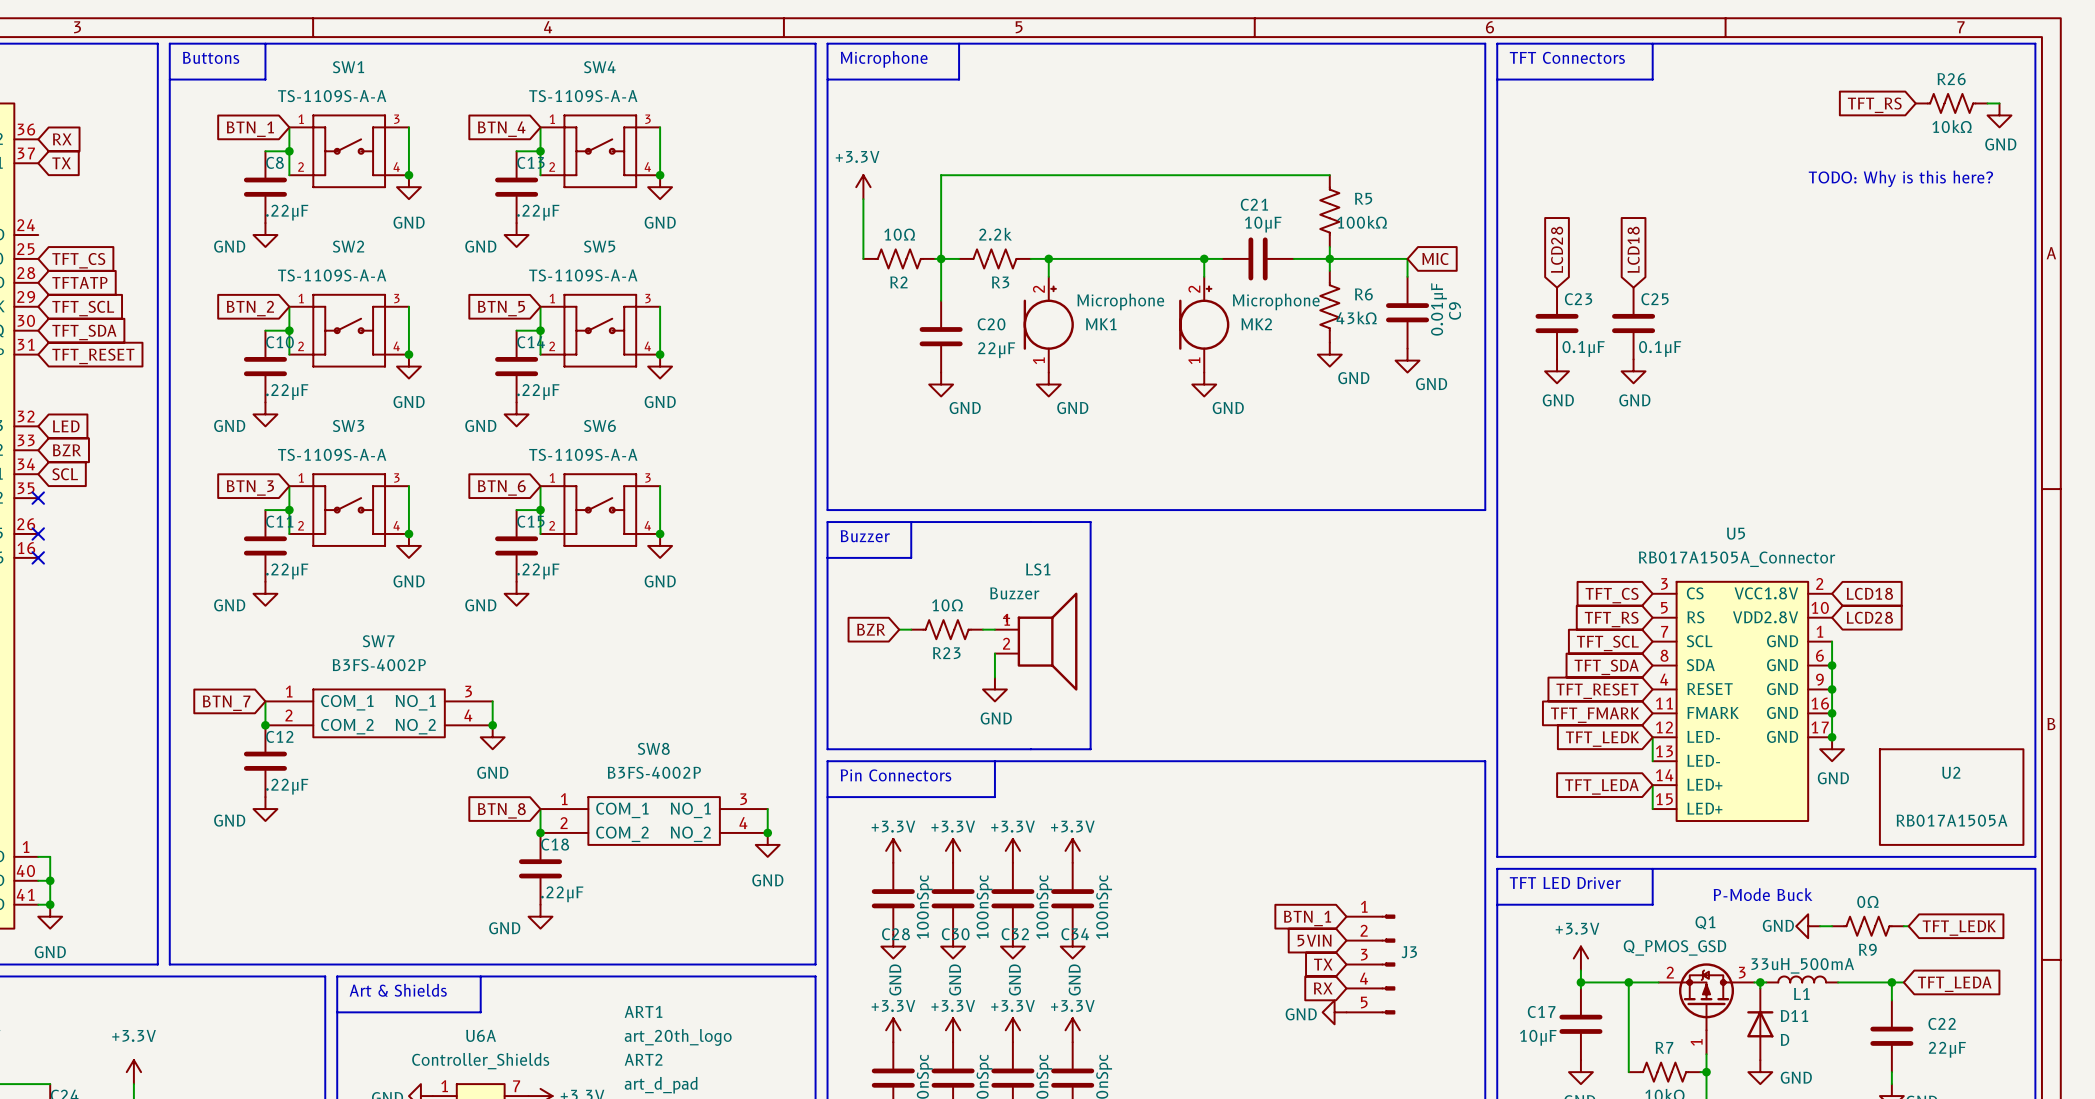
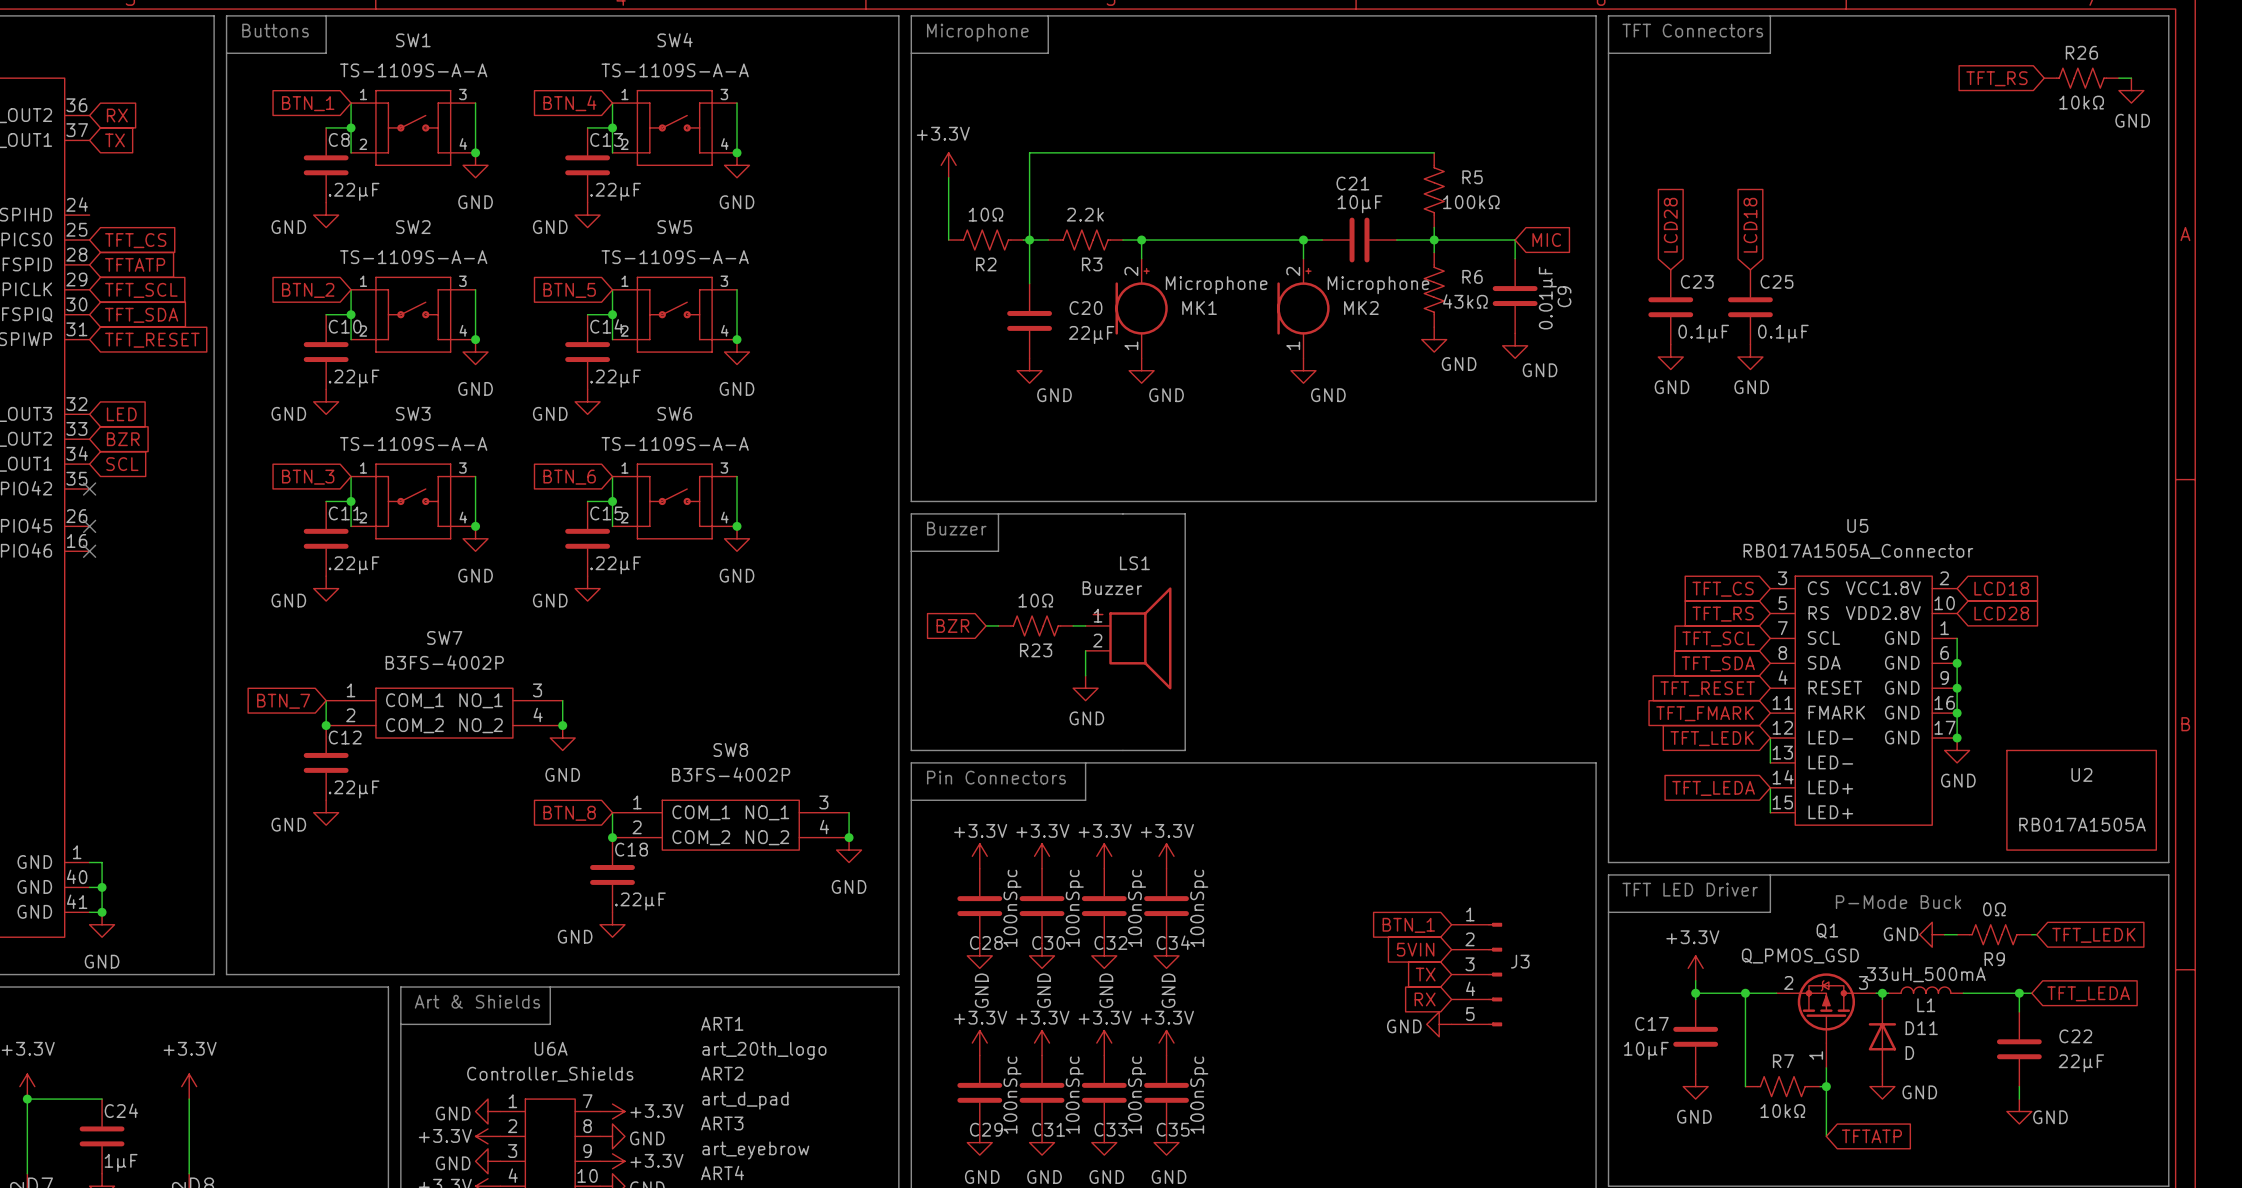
text: TODO: Why is this here? (1900, 178) -> none

